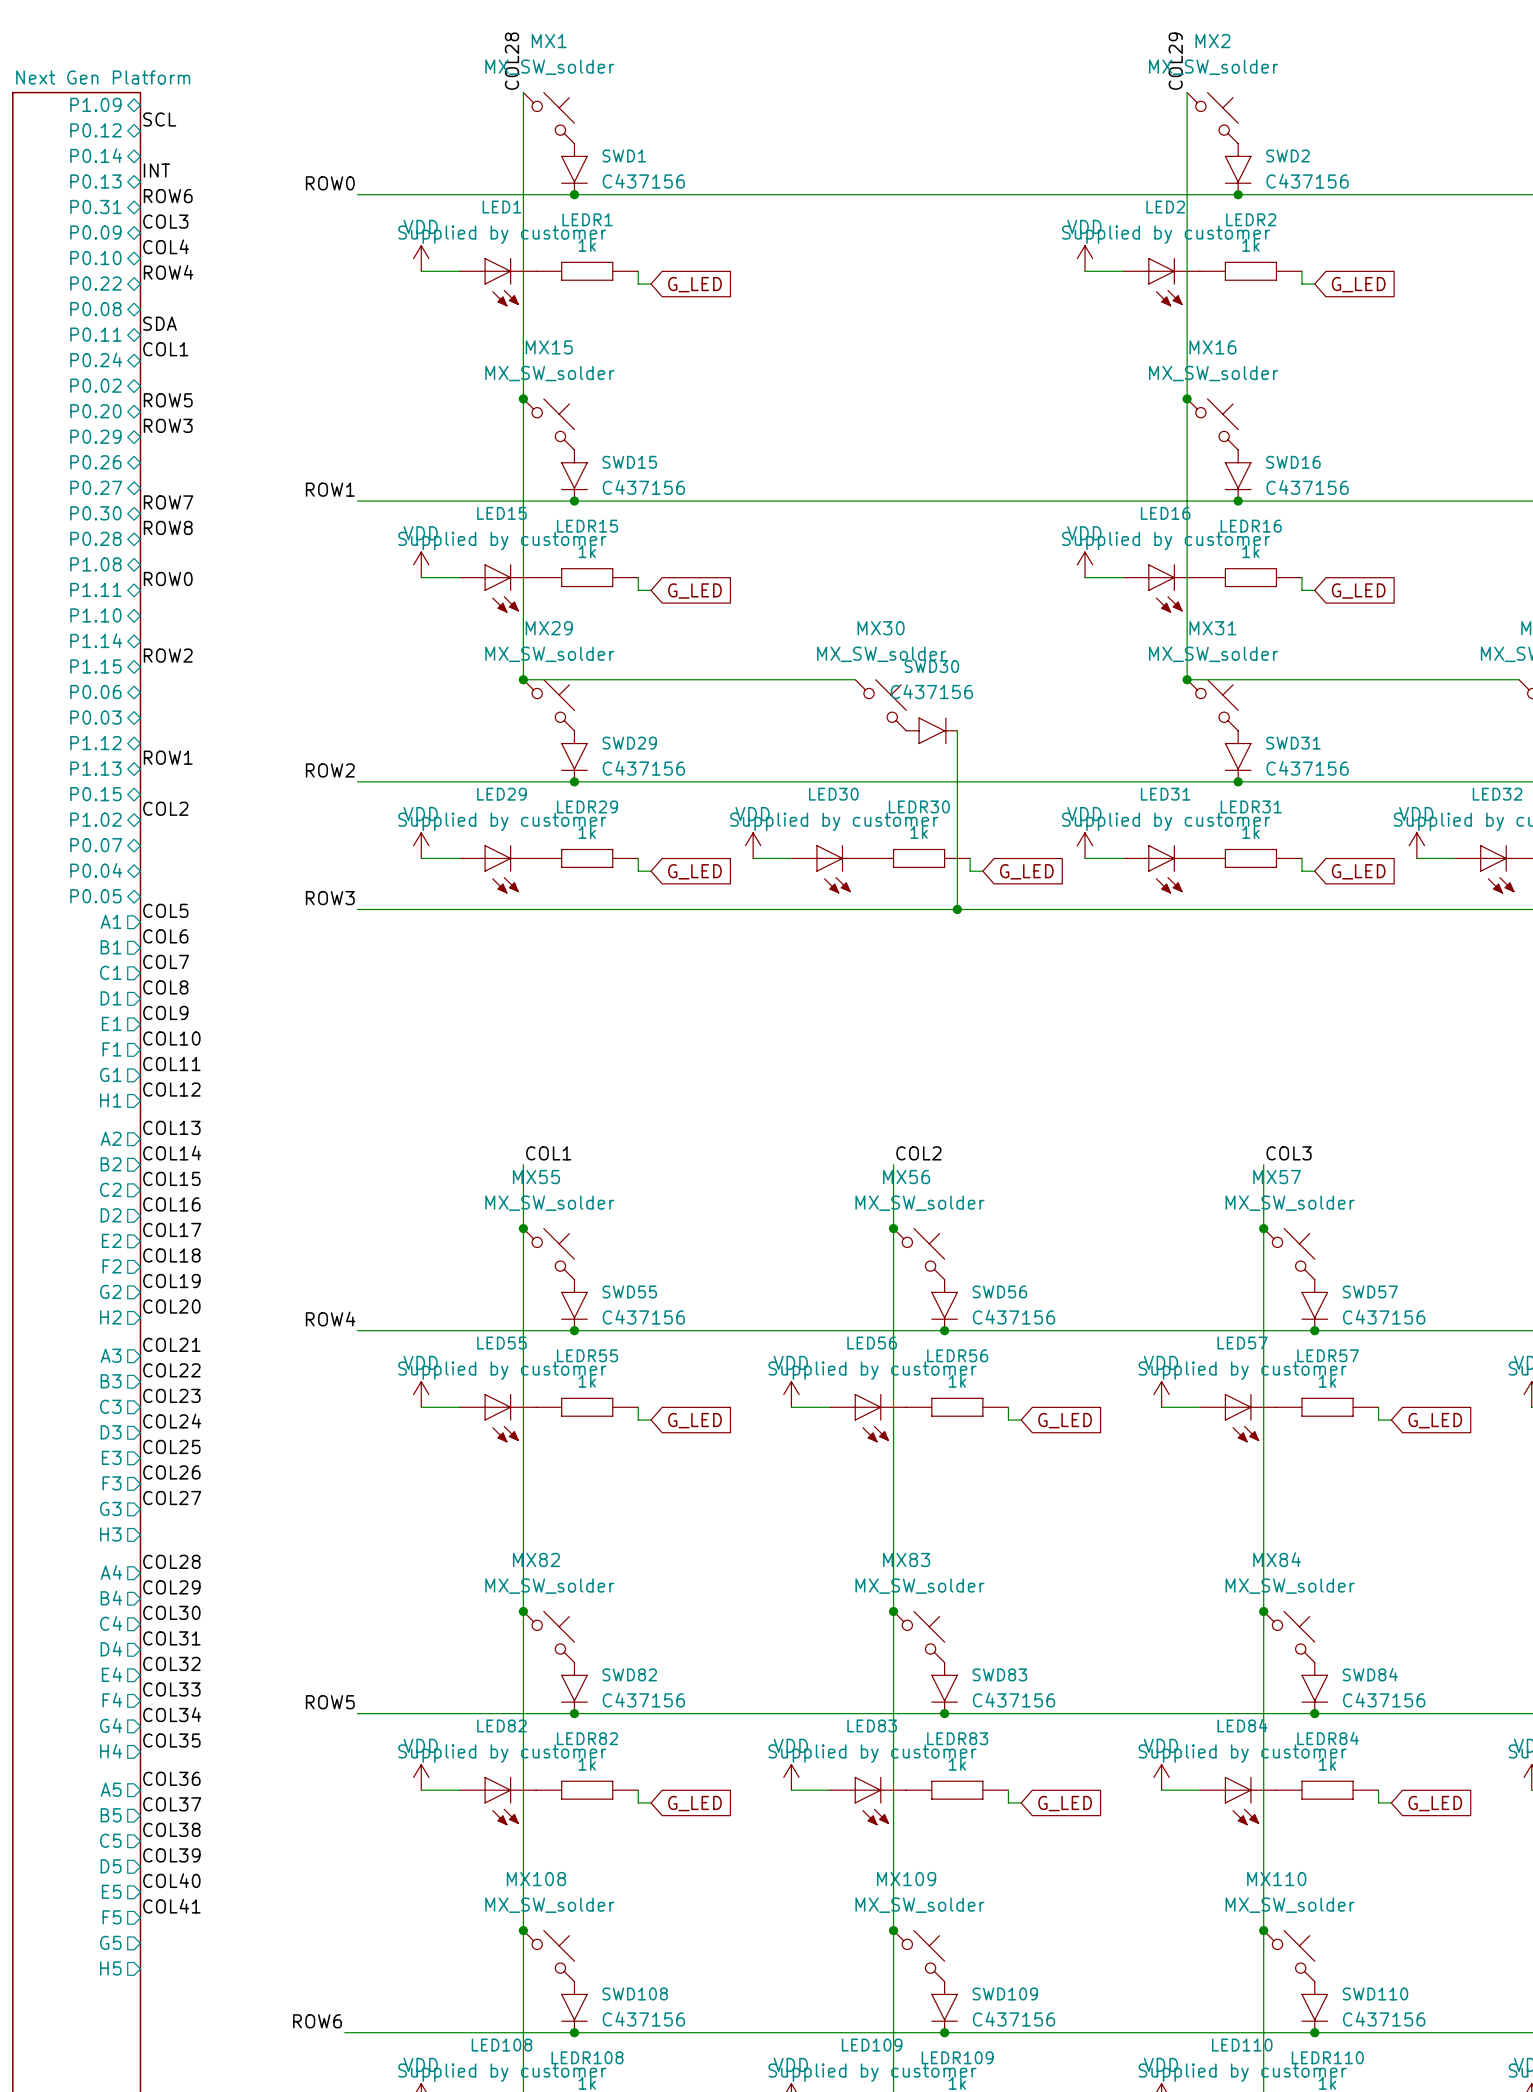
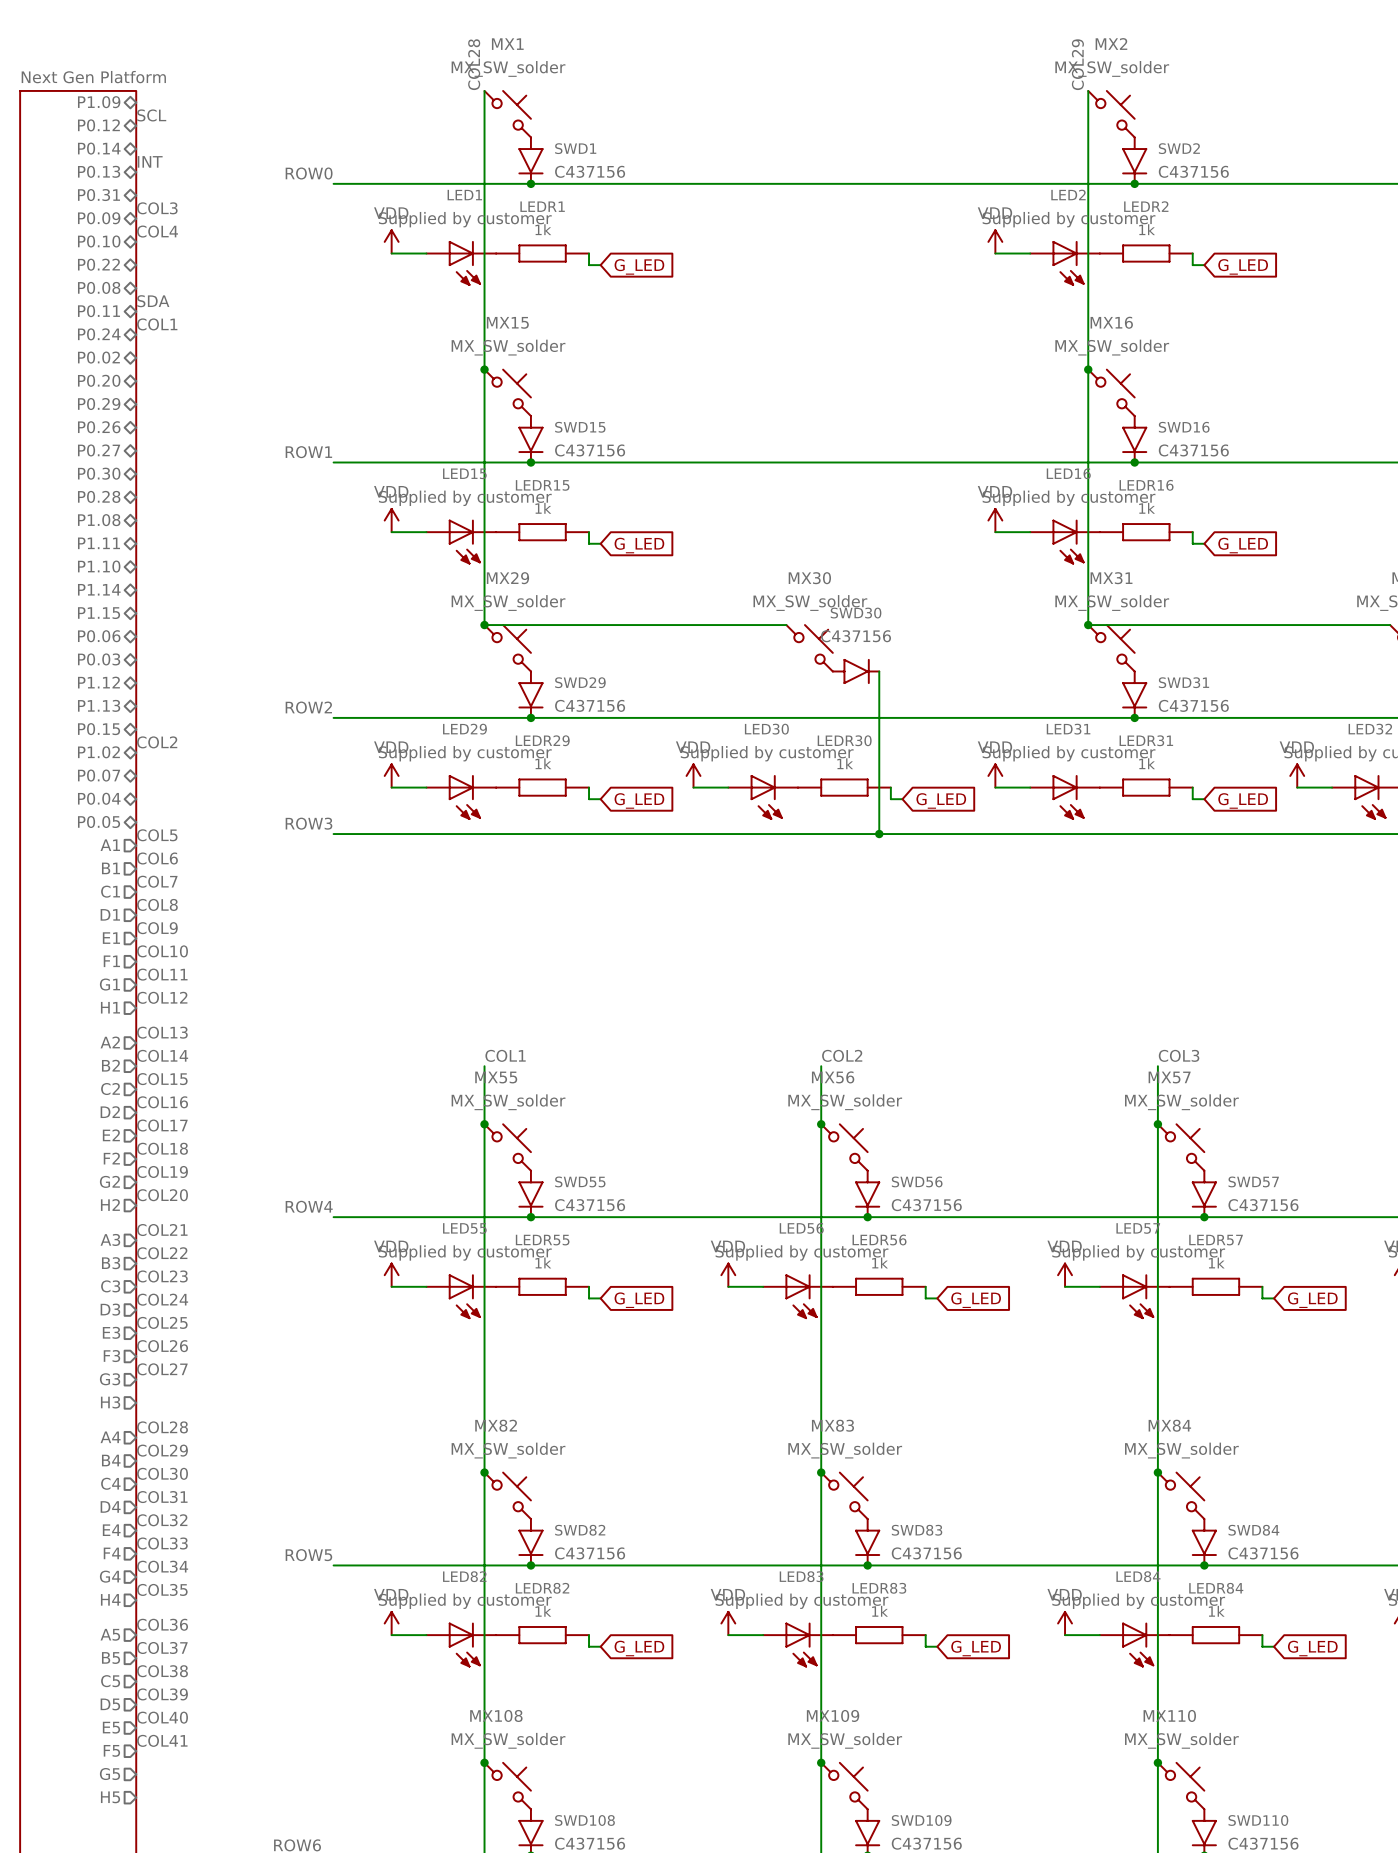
label: ROW6 (168, 196) -> none
label: ROW4 (168, 272) -> none
label: ROW5 (168, 400) -> none
label: ROW3 (168, 425) -> none
label: ROW7 (168, 502) -> none
label: ROW8 (168, 527) -> none
label: ROW0 (168, 578) -> none
label: ROW2 (168, 655) -> none
label: ROW1 (168, 757) -> none

